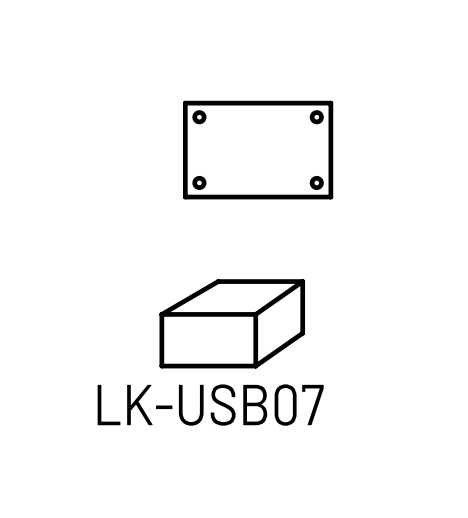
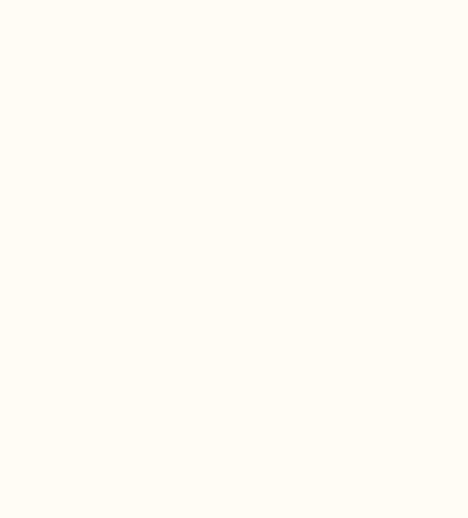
part: (258, 150) -> none
LK-USB07: (232, 323) -> none

